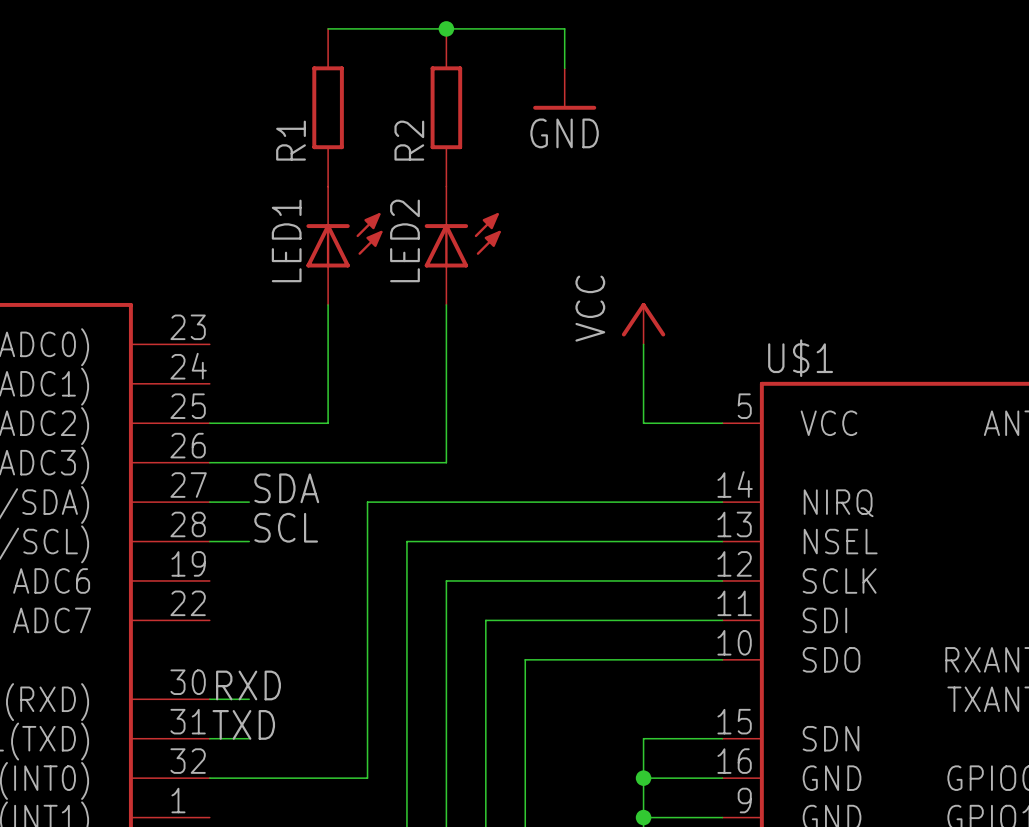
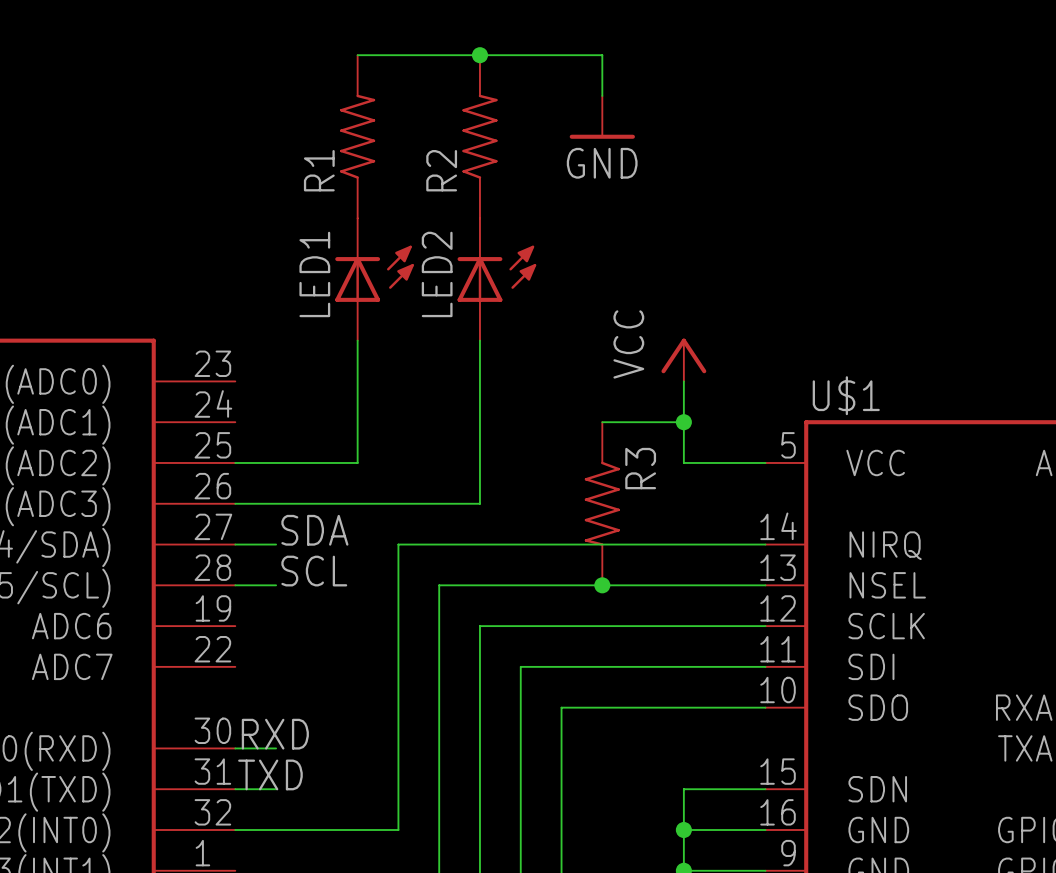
R1 symbol: [312, 28, 344, 187] -> [340, 55, 376, 219]
R2 symbol: [430, 28, 463, 187] -> [462, 55, 498, 219]
wire: none -> (602, 422) (683, 422)
junction: none -> (683, 422)
R3: none -> (602, 503)
junction: none -> (602, 585)

